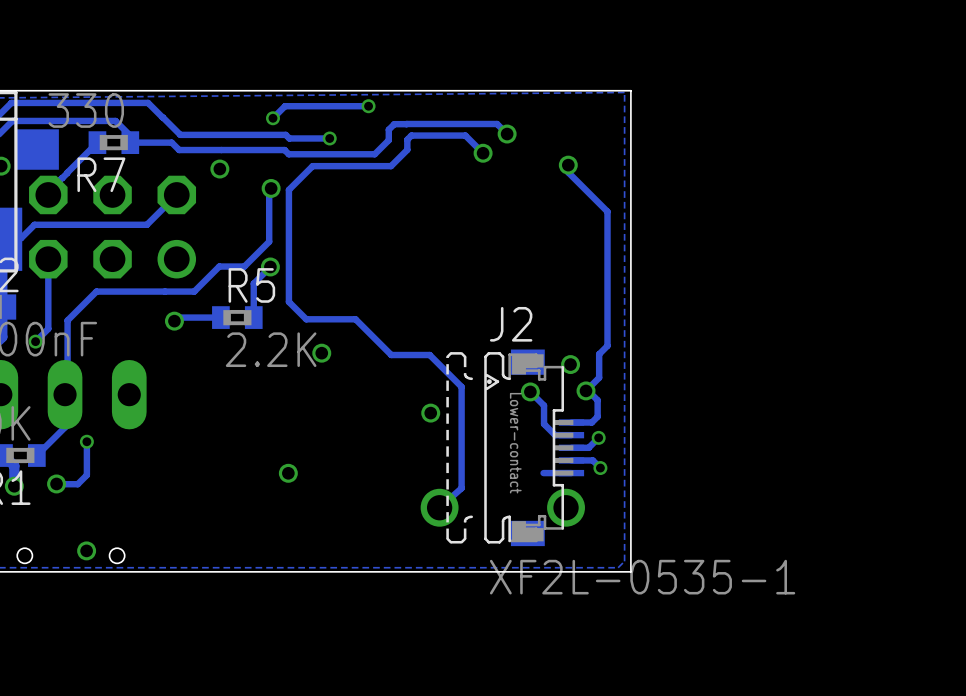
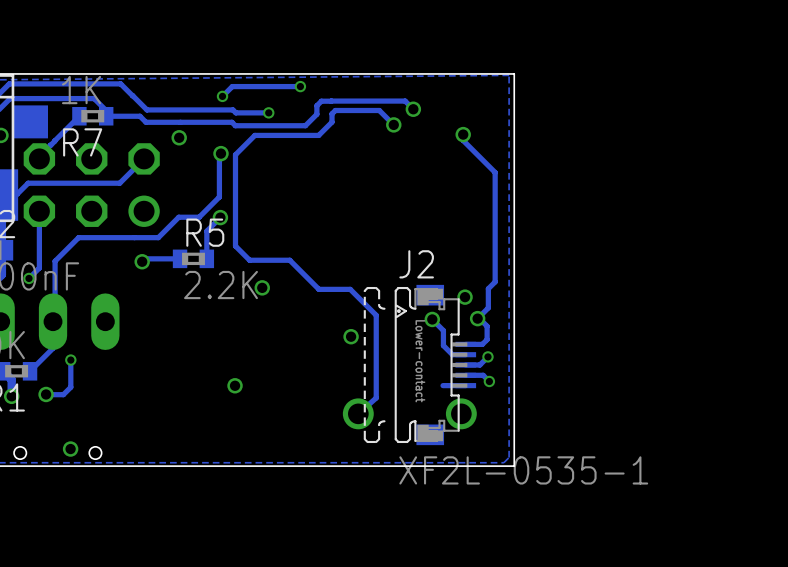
R7 value: 330 (86, 110) -> 1K (81, 90)

